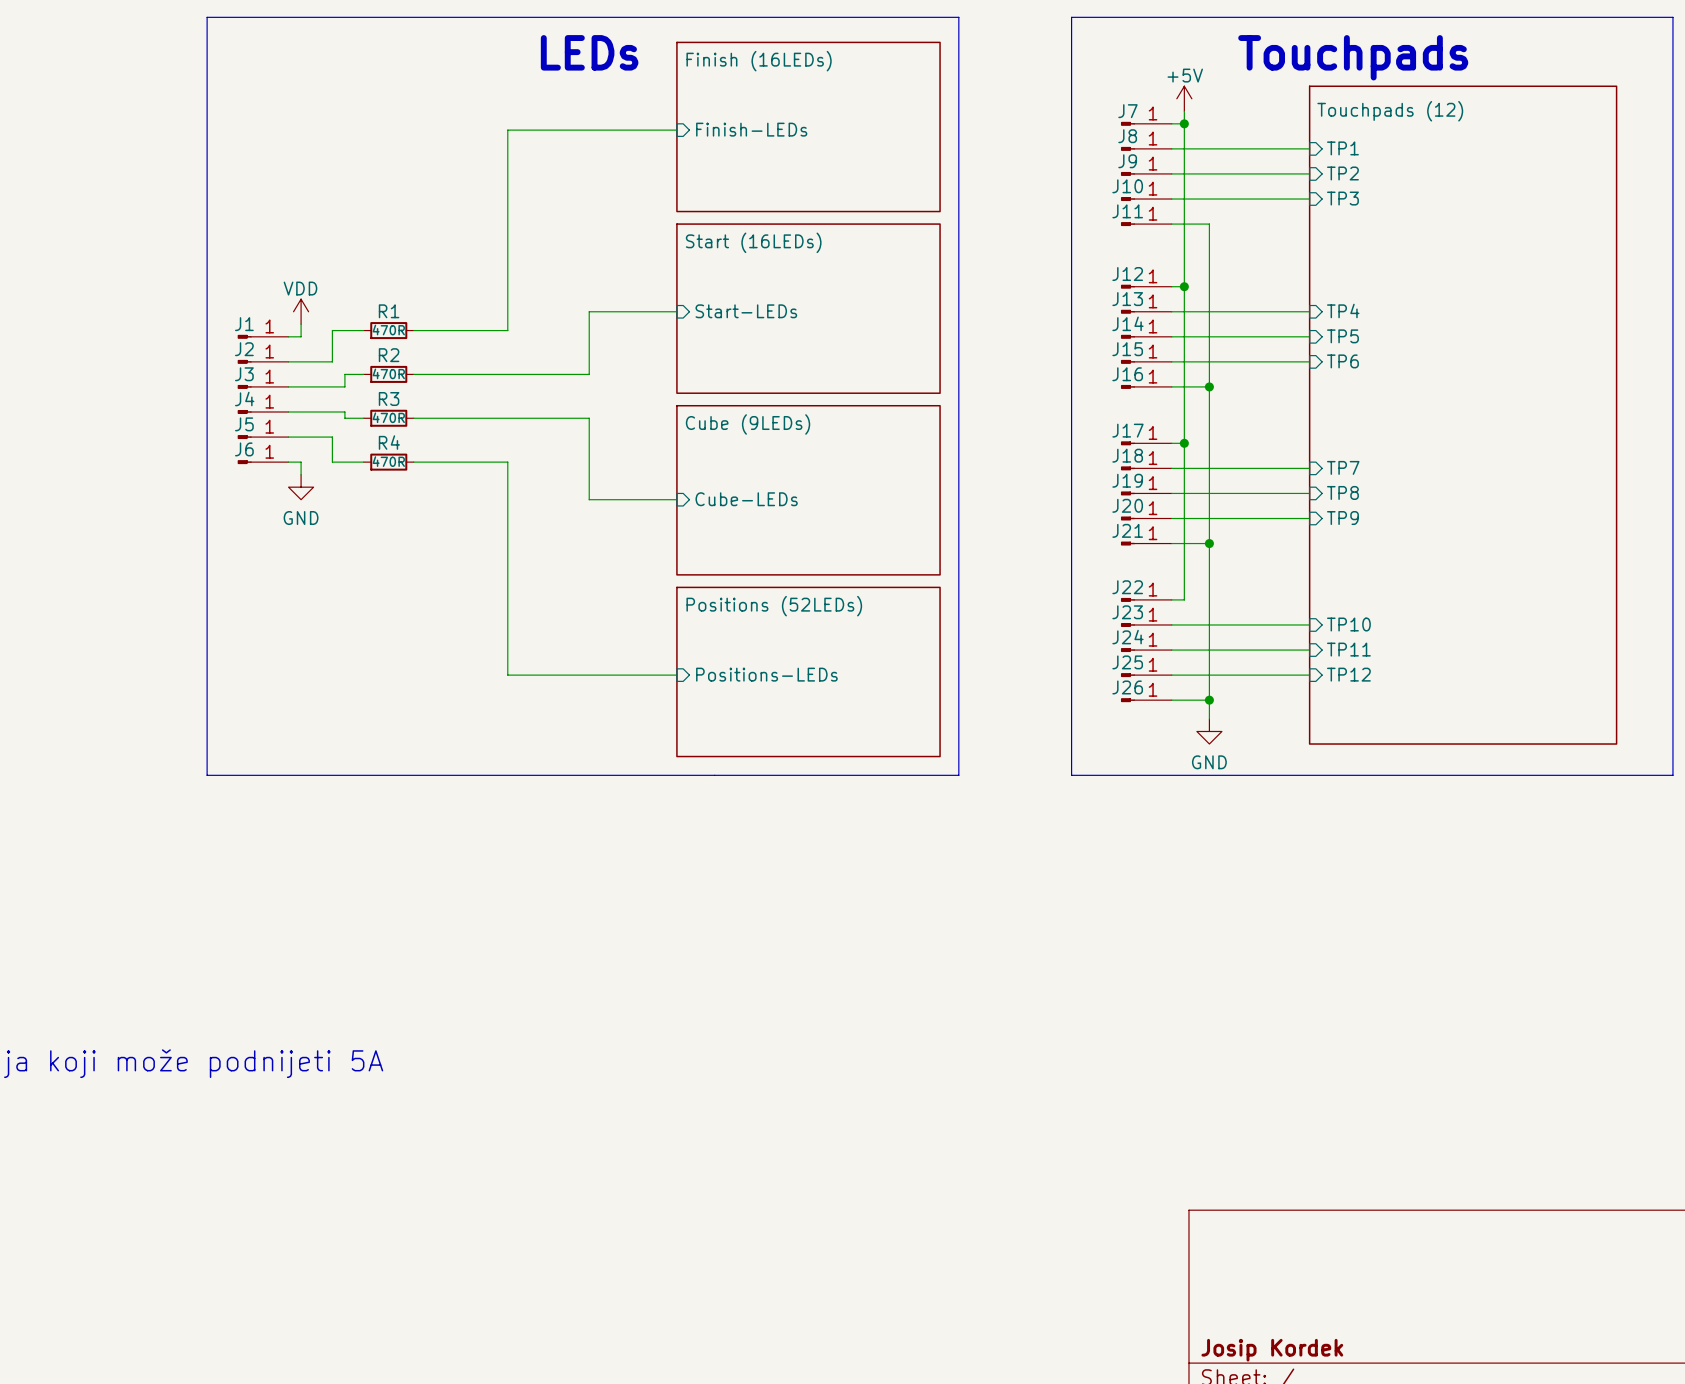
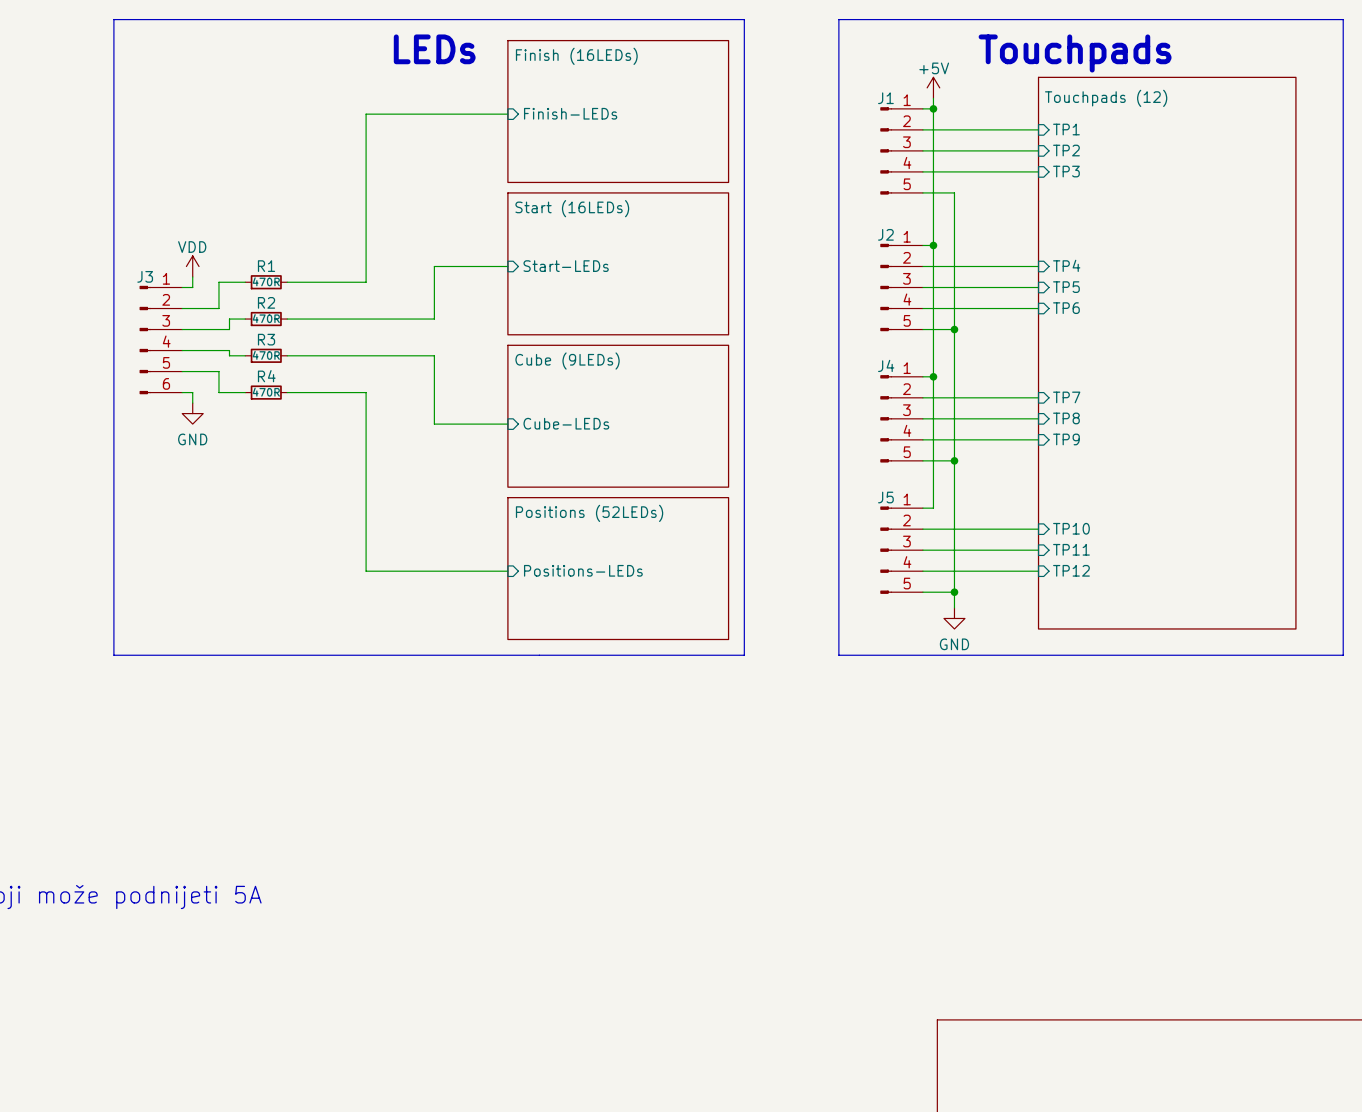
J7: (1146, 123) -> none
J8: (1146, 148) -> none
J9: (1146, 173) -> none
J10: (1146, 199) -> none
J11: (1146, 224) -> none
J12: (1146, 286) -> none
J13: (1146, 311) -> none
J1 name position: J1 (244, 324) -> J1 (885, 98)
J1 symbol: [237, 334, 289, 339] -> [880, 107, 923, 195]
J14: (1146, 336) -> none
J2 name position: J2 (244, 349) -> J2 (885, 234)
J2 symbol: [237, 359, 289, 364] -> [880, 243, 923, 332]
J15: (1146, 361) -> none
J3 name position: J3 (244, 374) -> J3 (145, 276)
J3 symbol: [237, 384, 289, 389] -> [139, 285, 183, 395]
J16: (1146, 386) -> none
J4 name position: J4 (244, 399) -> J4 (886, 365)
J4 symbol: [237, 409, 289, 415] -> [880, 375, 923, 463]
J5 name position: J5 (244, 424) -> J5 (885, 497)
J5 symbol: [237, 435, 289, 440] -> [880, 506, 923, 594]
J17: (1146, 443) -> none
J6: (263, 462) -> none
J18: (1146, 468) -> none
J19: (1146, 493) -> none
J20: (1146, 518) -> none
J21: (1146, 543) -> none
J22: (1146, 599) -> none
J23: (1146, 624) -> none
J24: (1146, 650) -> none
J25: (1146, 675) -> none
J26: (1146, 700) -> none

